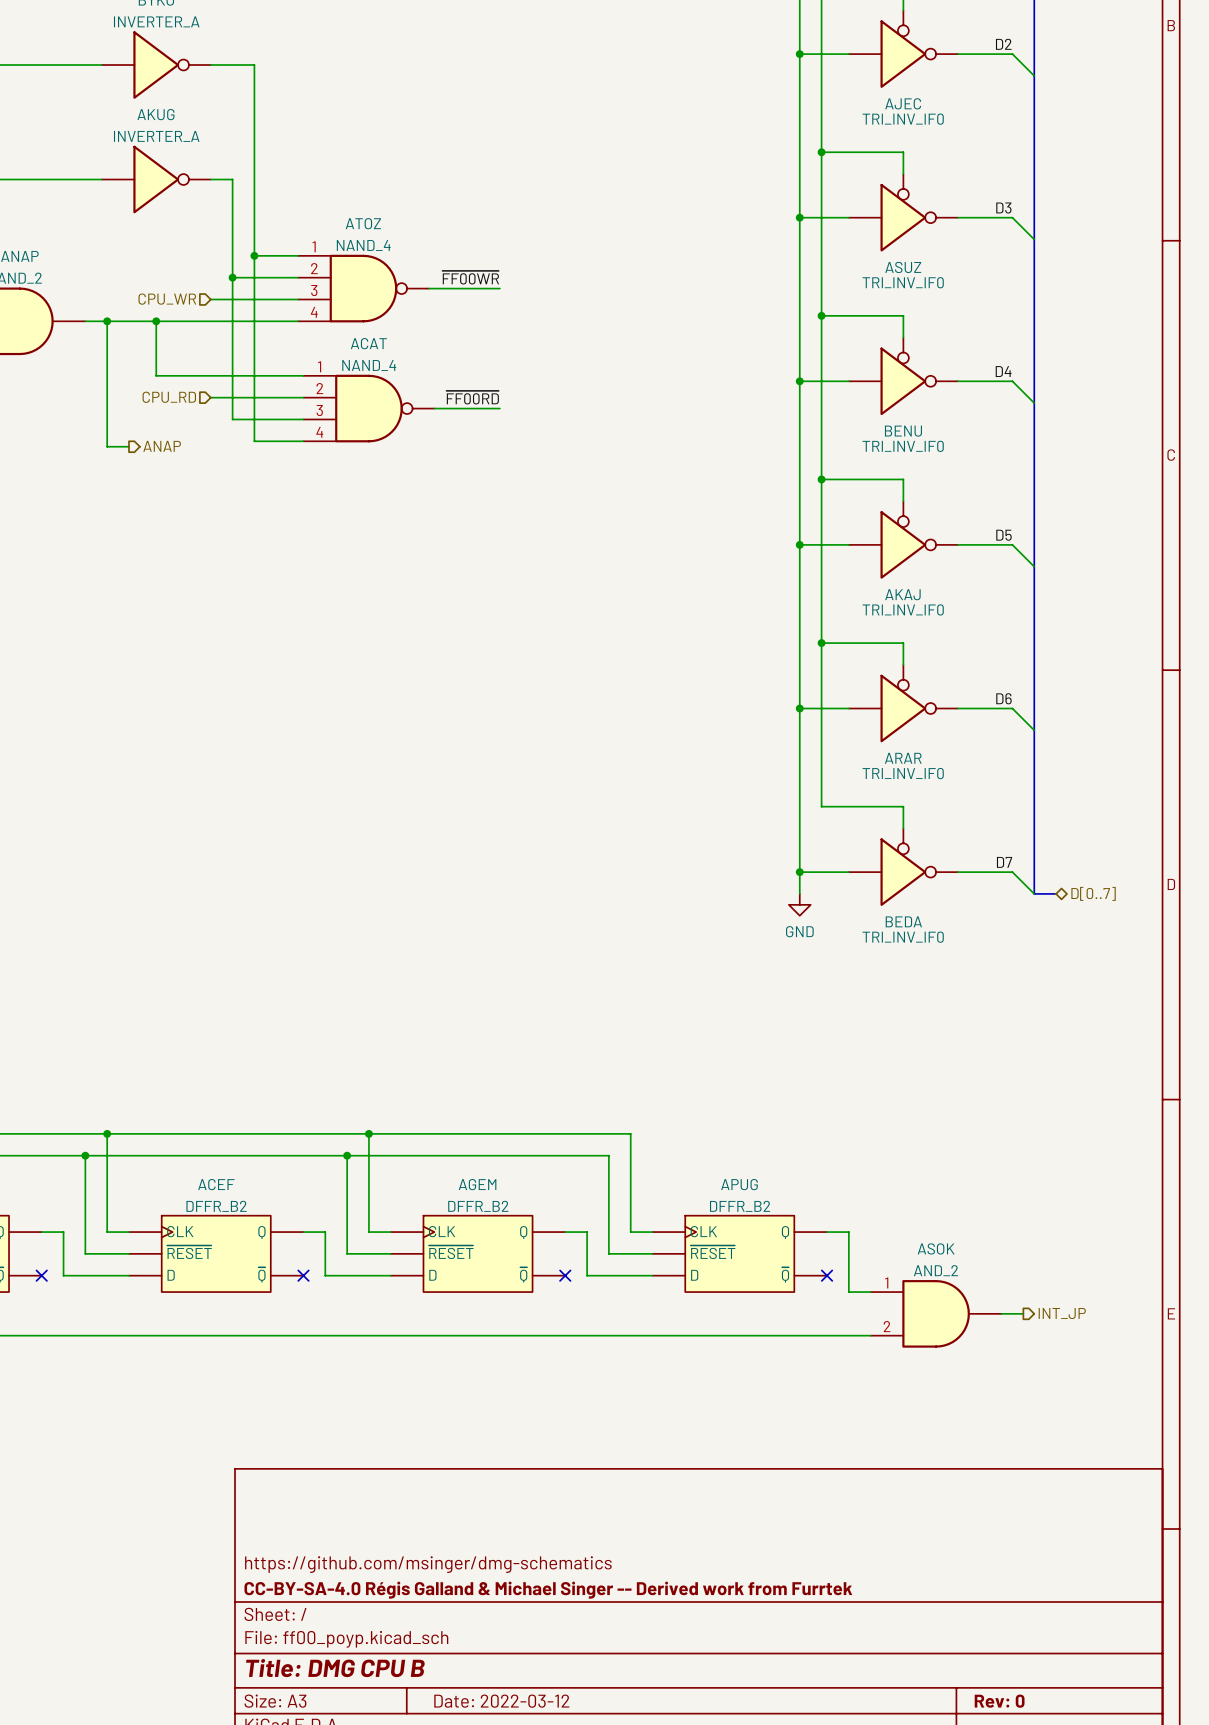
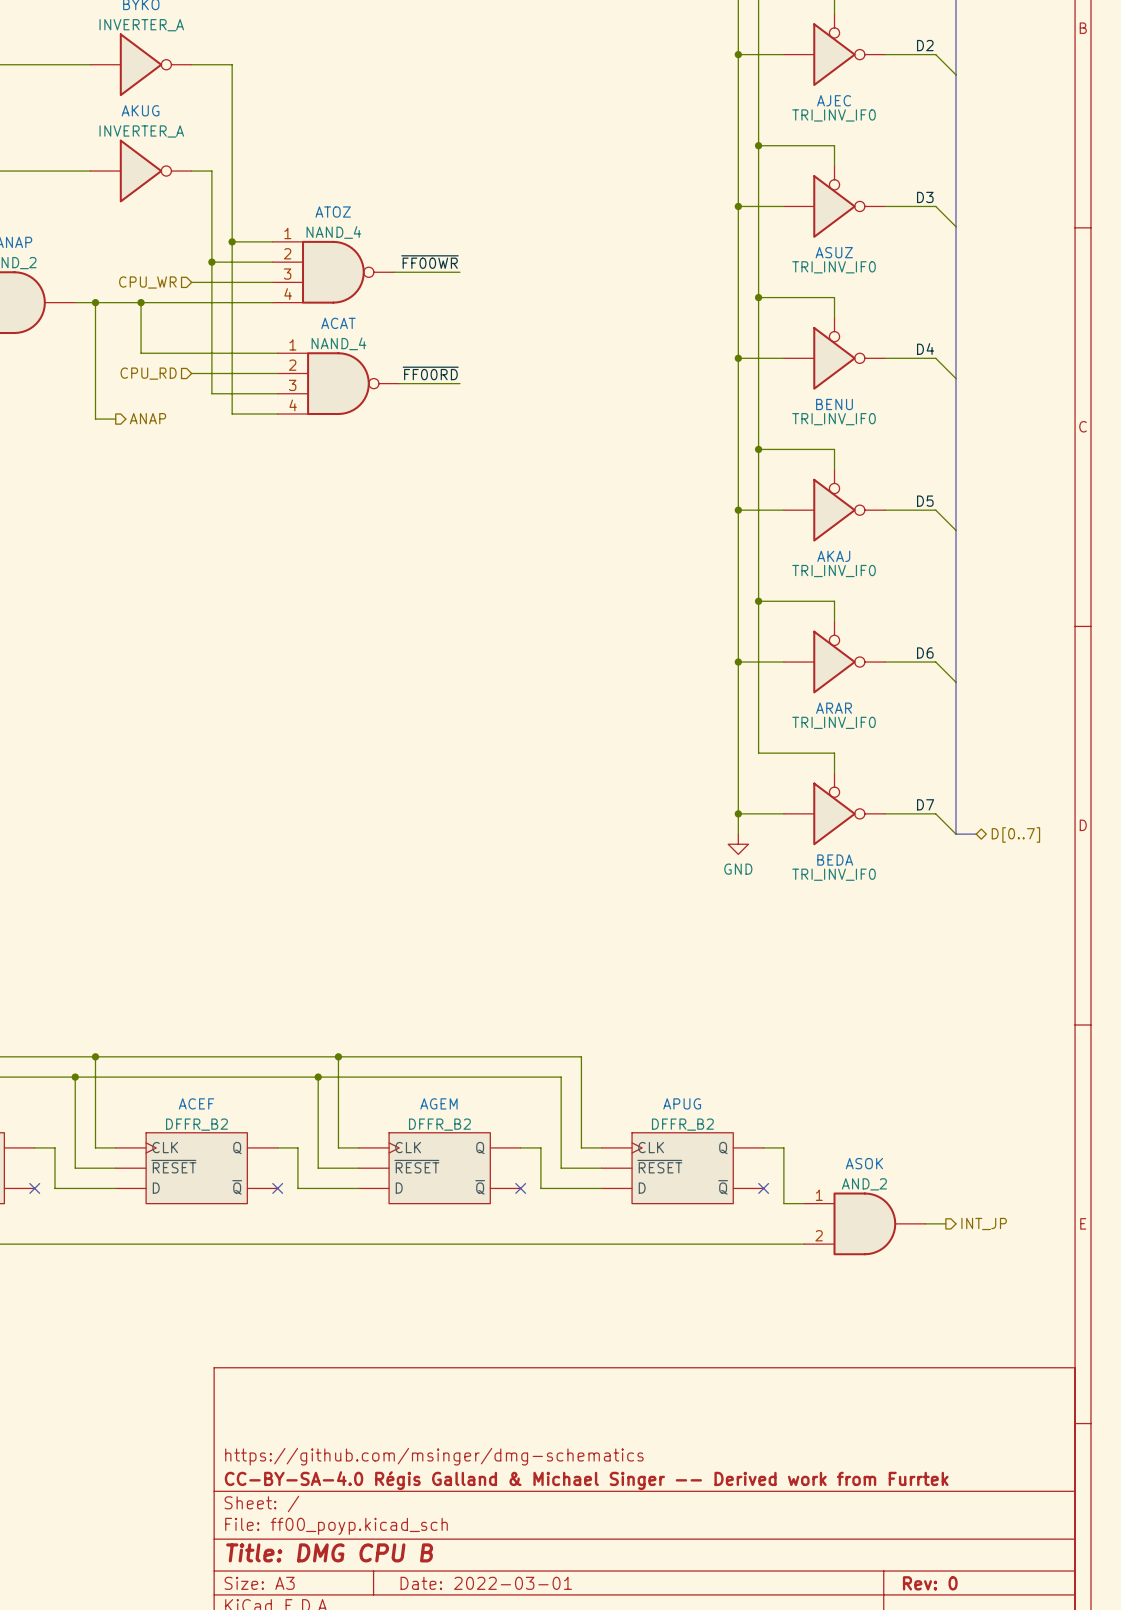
title block: Date: 2022-03-12 (501, 1701) -> Date: 2022-03-01 (486, 1583)

